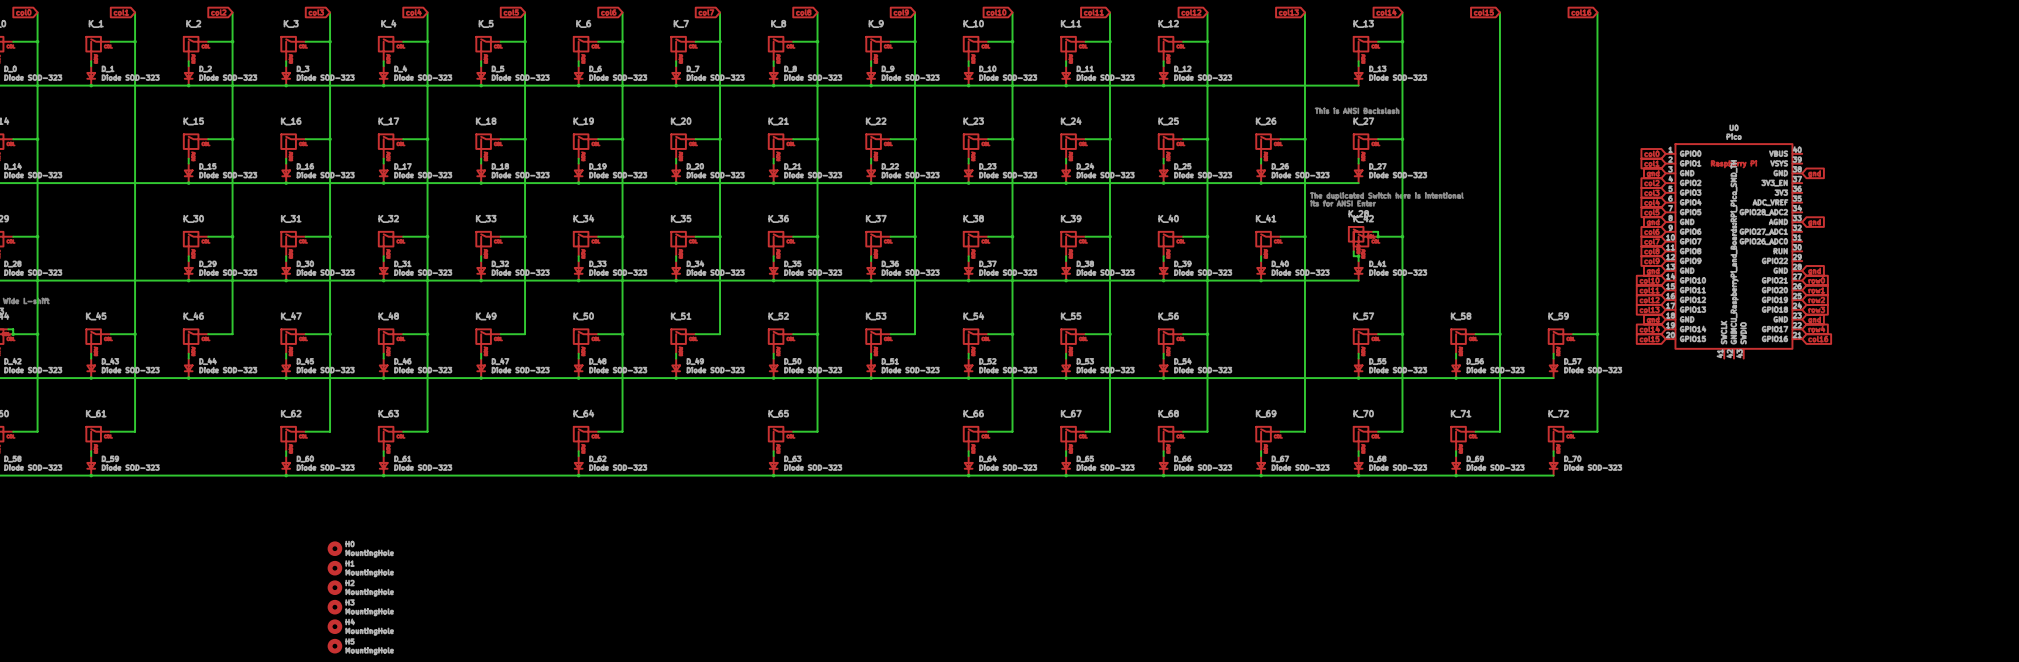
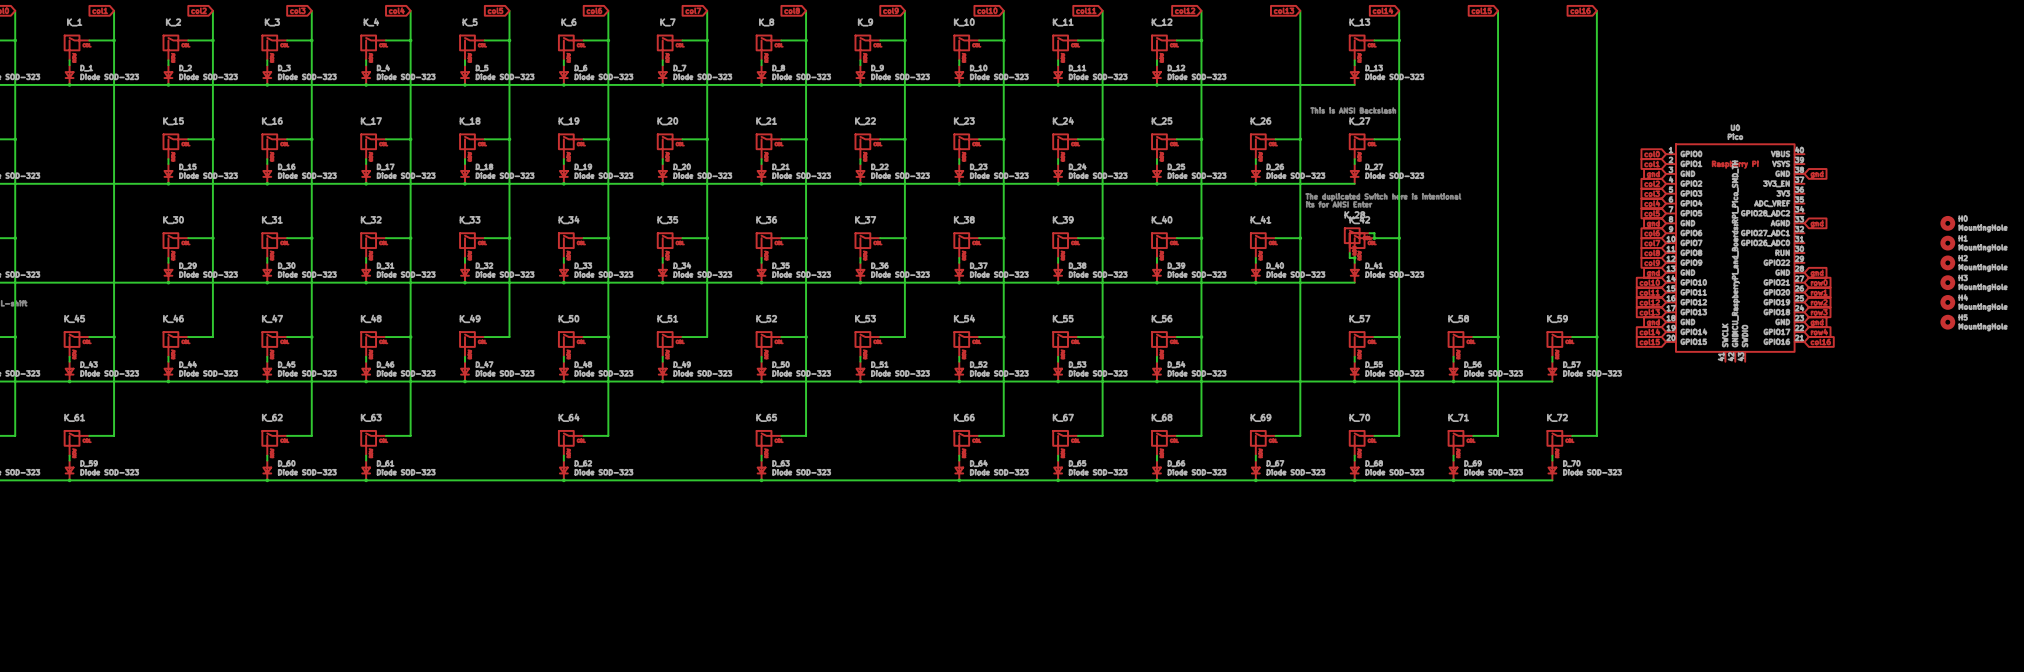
part position: (334, 548) -> (1947, 223)
part position: (334, 568) -> (1947, 243)
part position: (334, 587) -> (1947, 262)
part position: (334, 607) -> (1947, 282)
part position: (334, 626) -> (1947, 302)
part position: (334, 646) -> (1947, 322)

